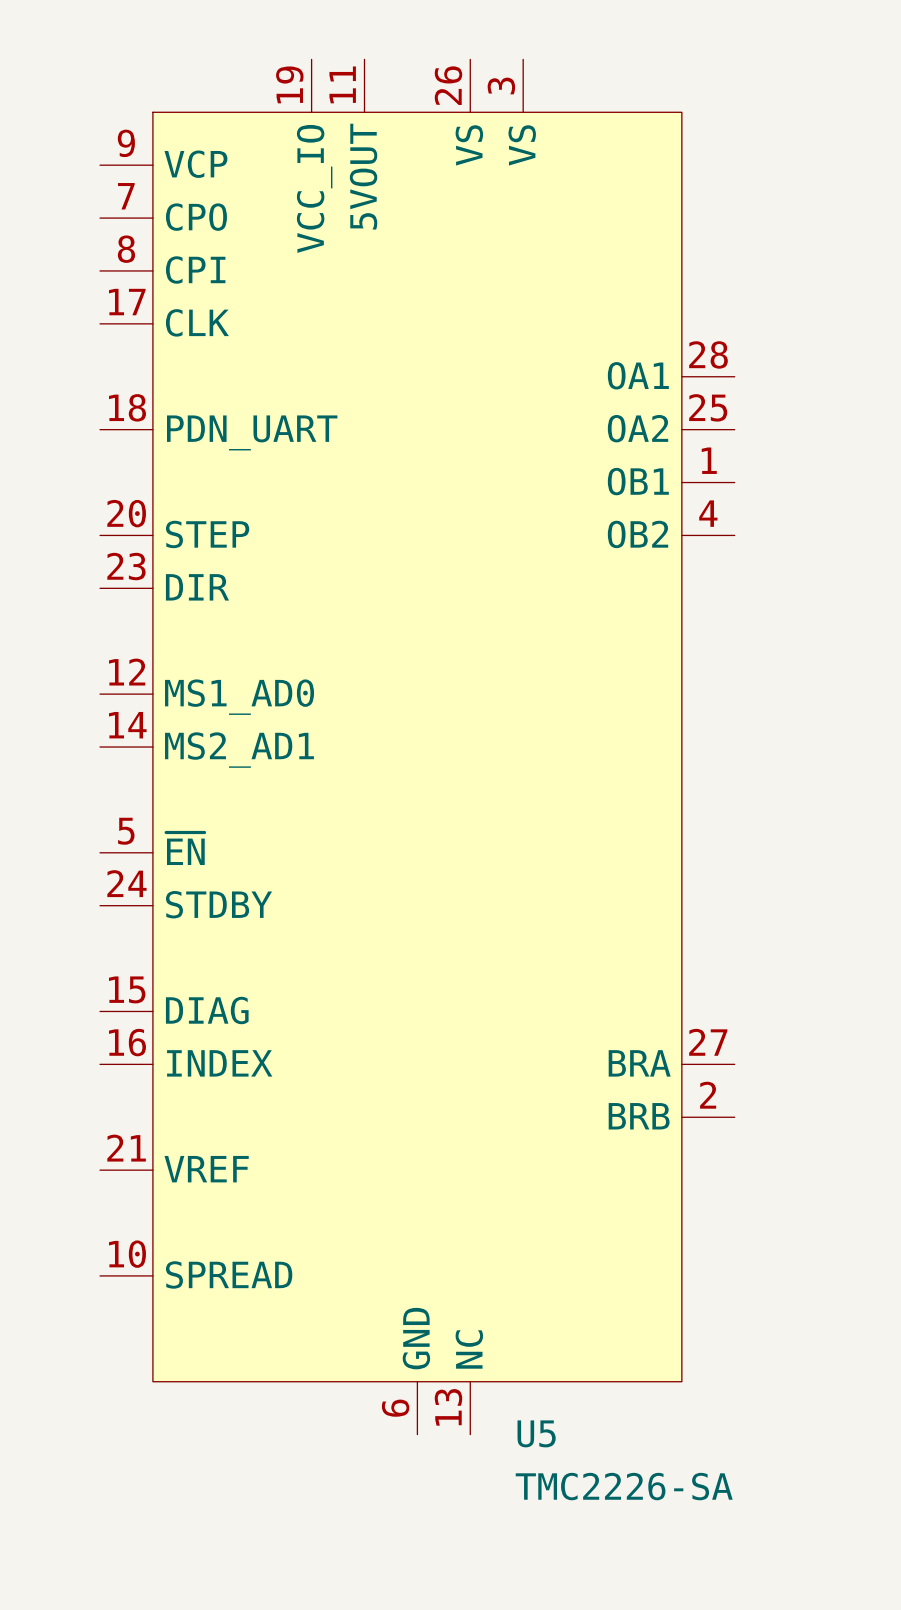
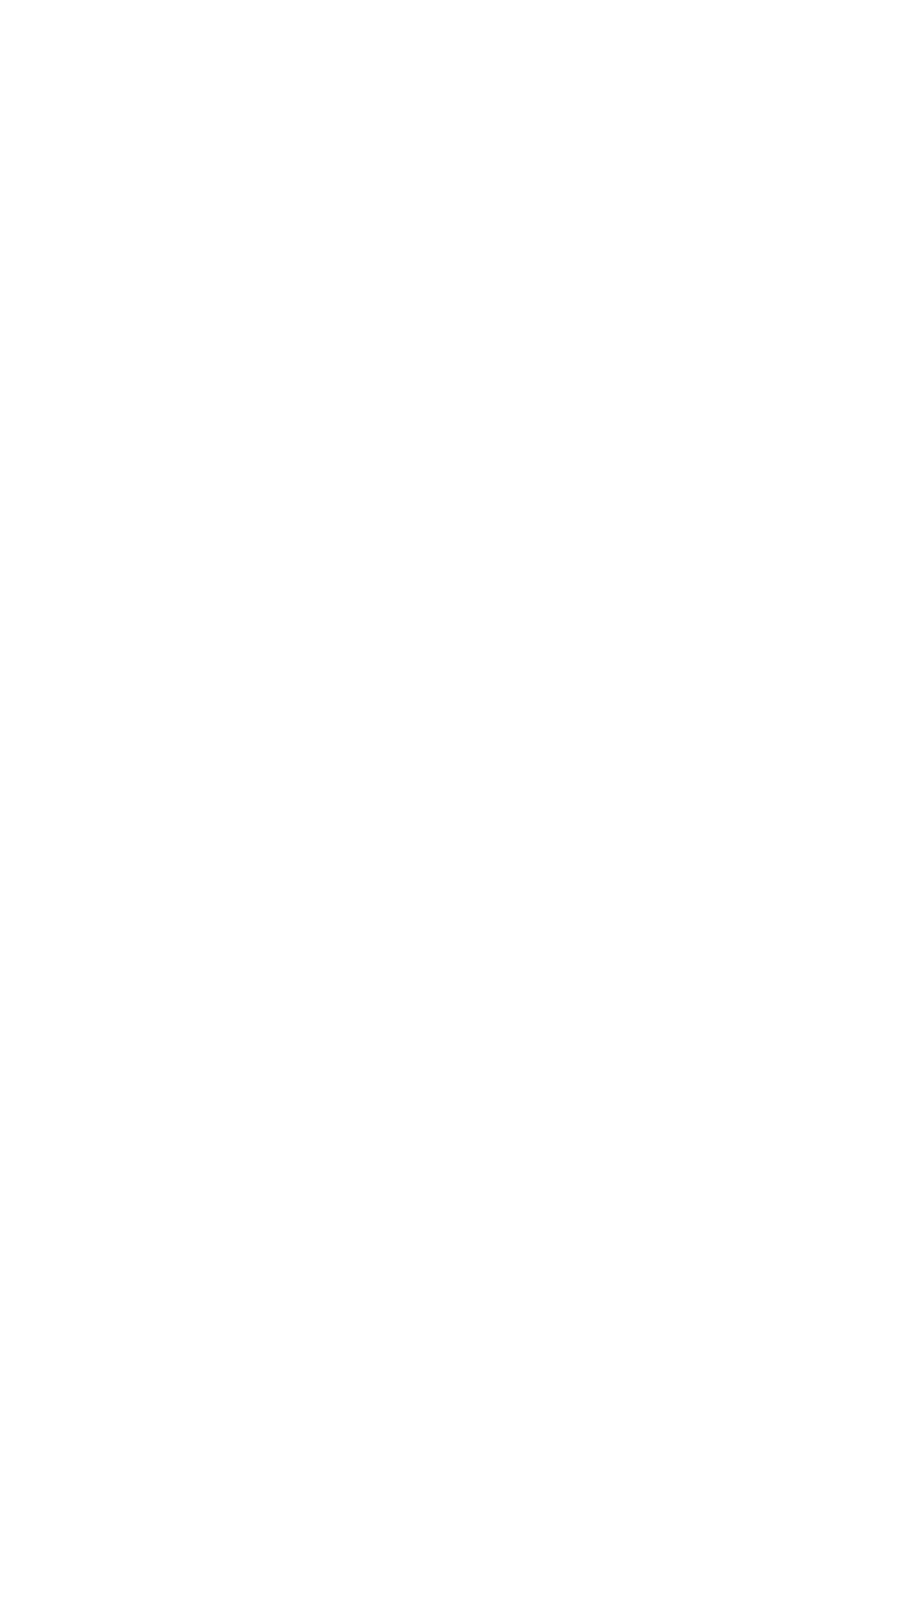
U5: TMC2226-SA (417, 747) -> none

